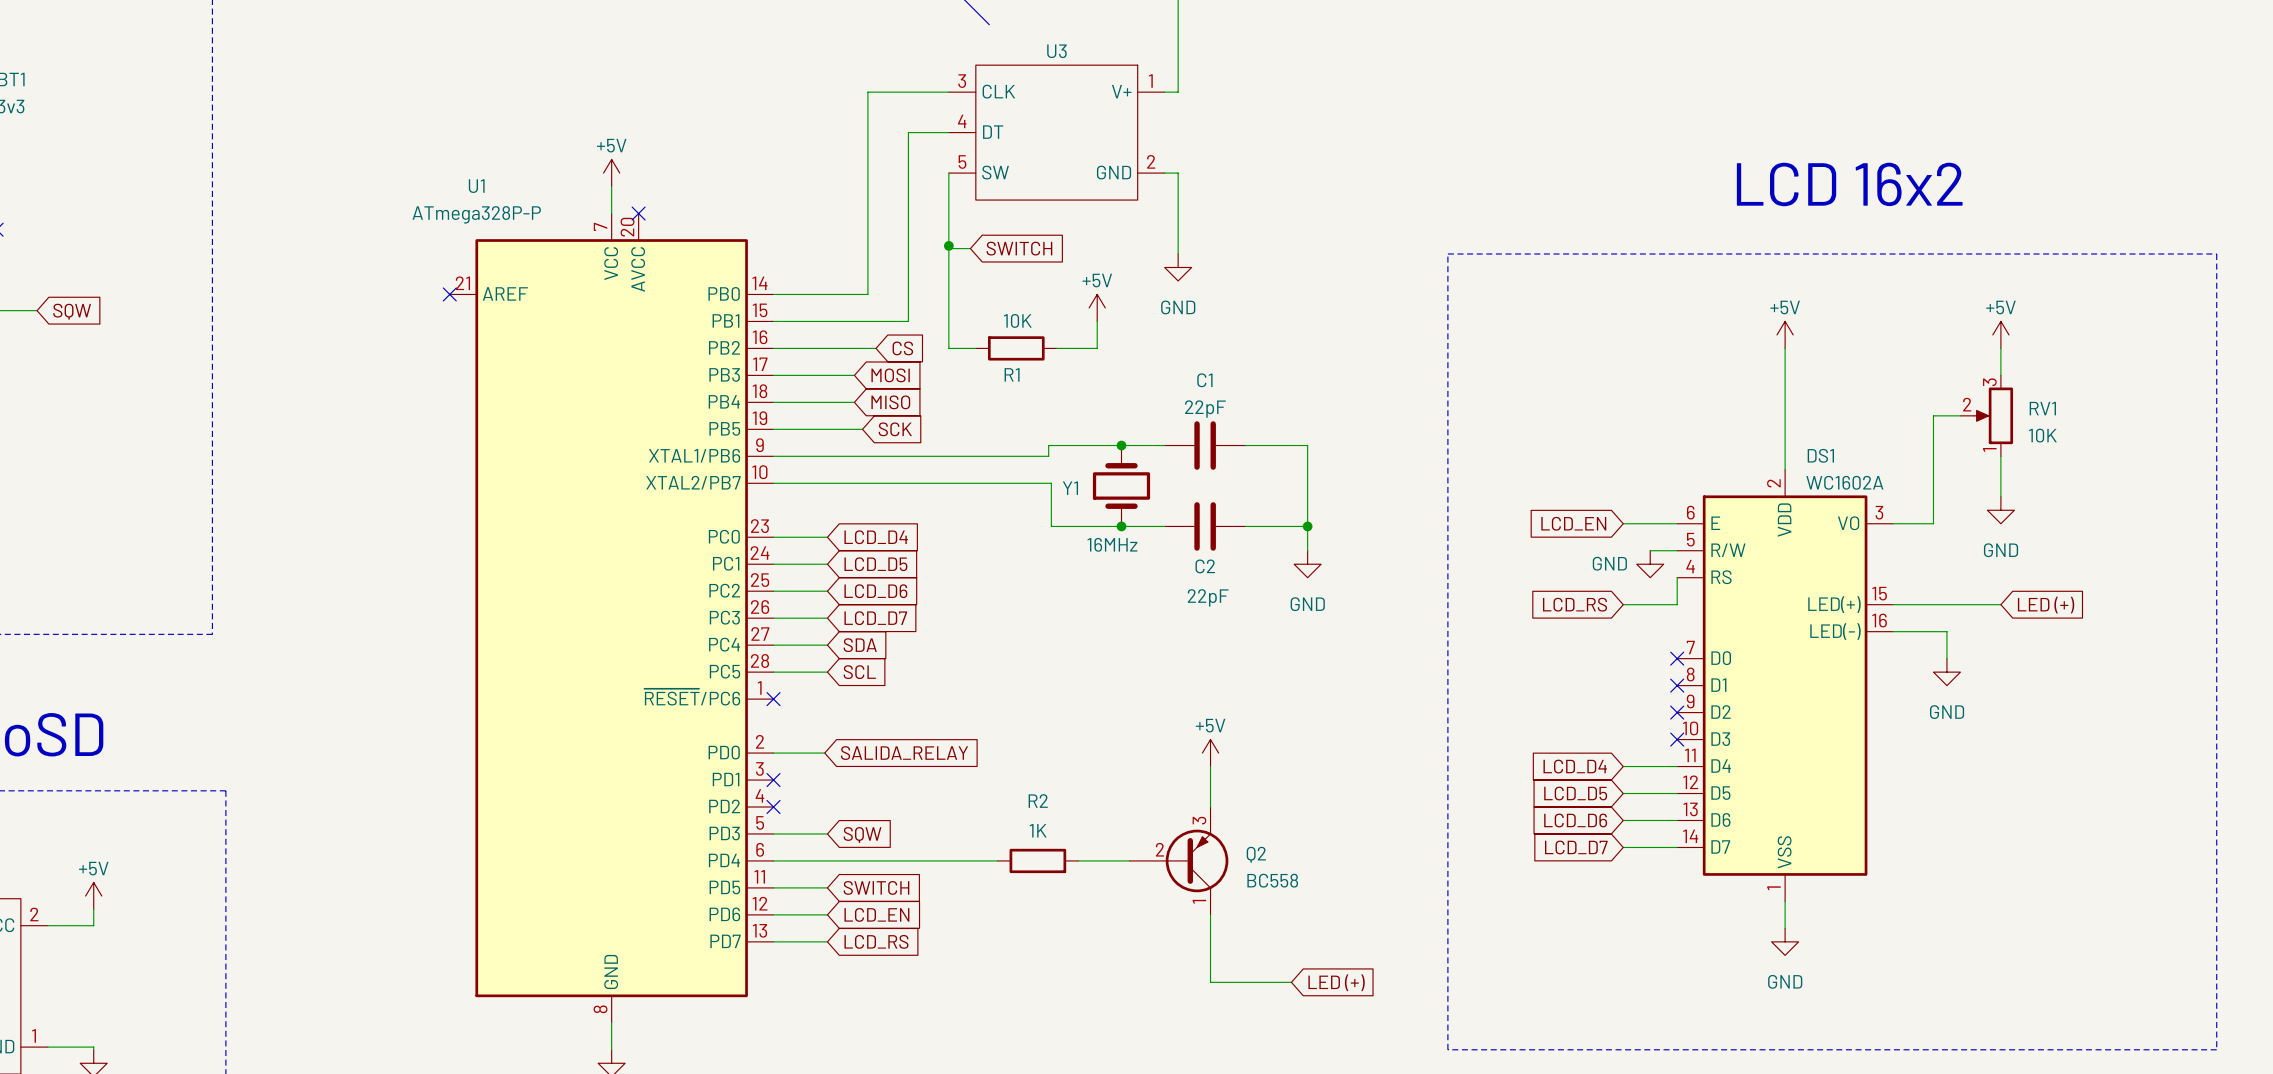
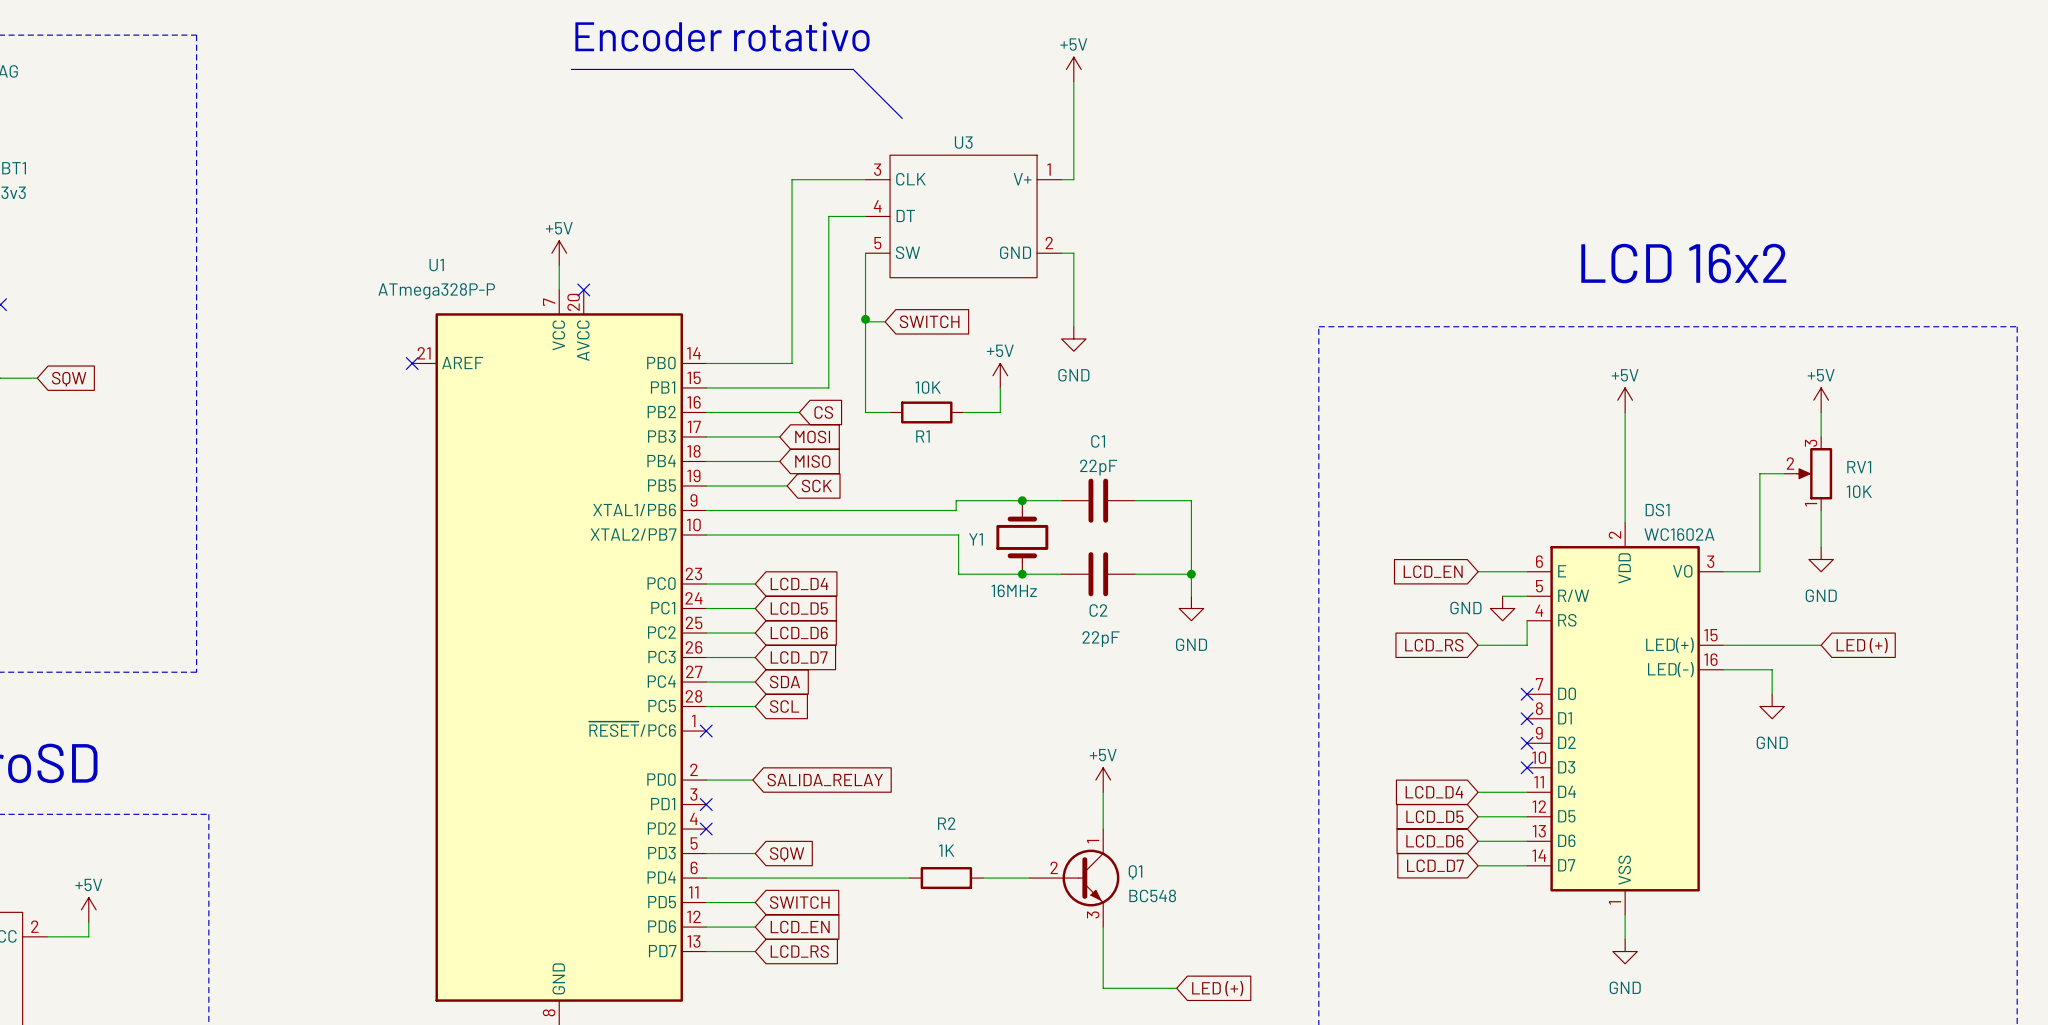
Q2: BC558 (1178, 860) -> none
Q1: none -> BC548 (1074, 878)

